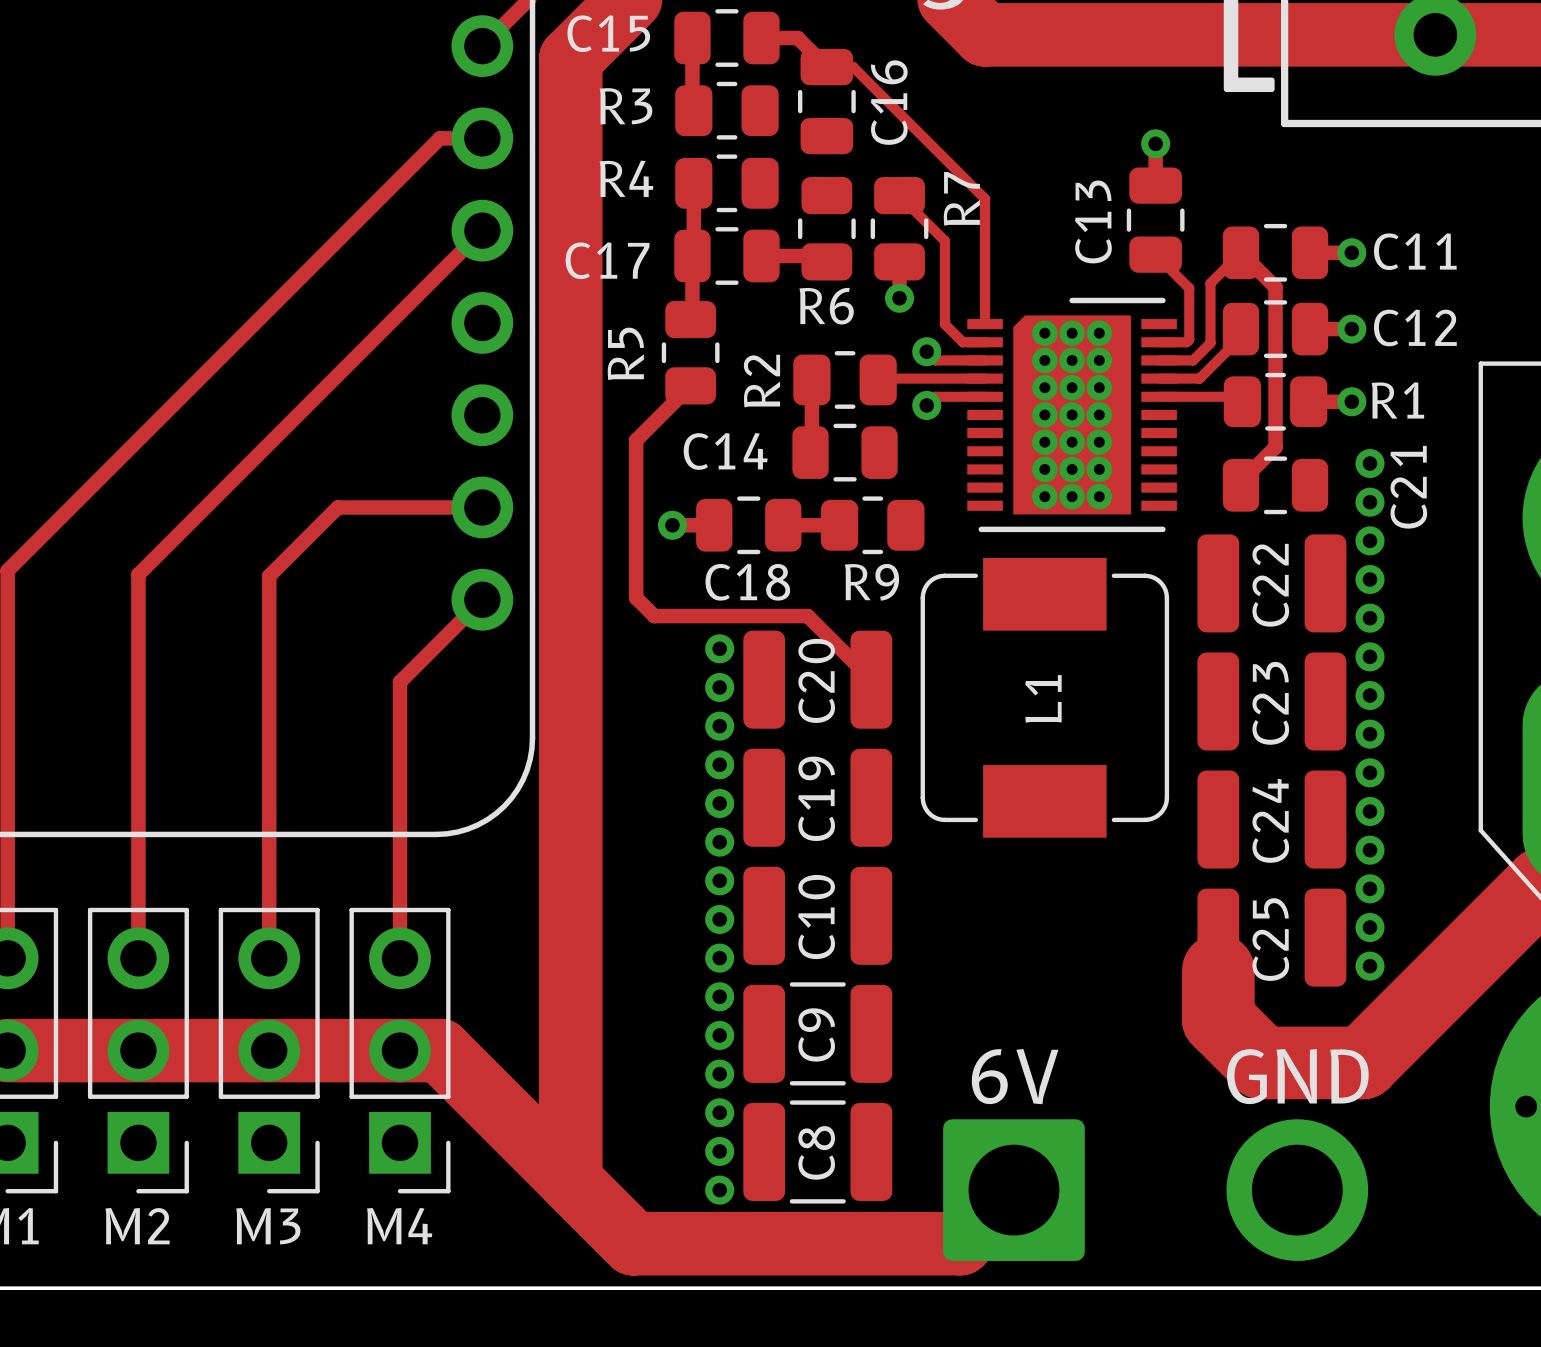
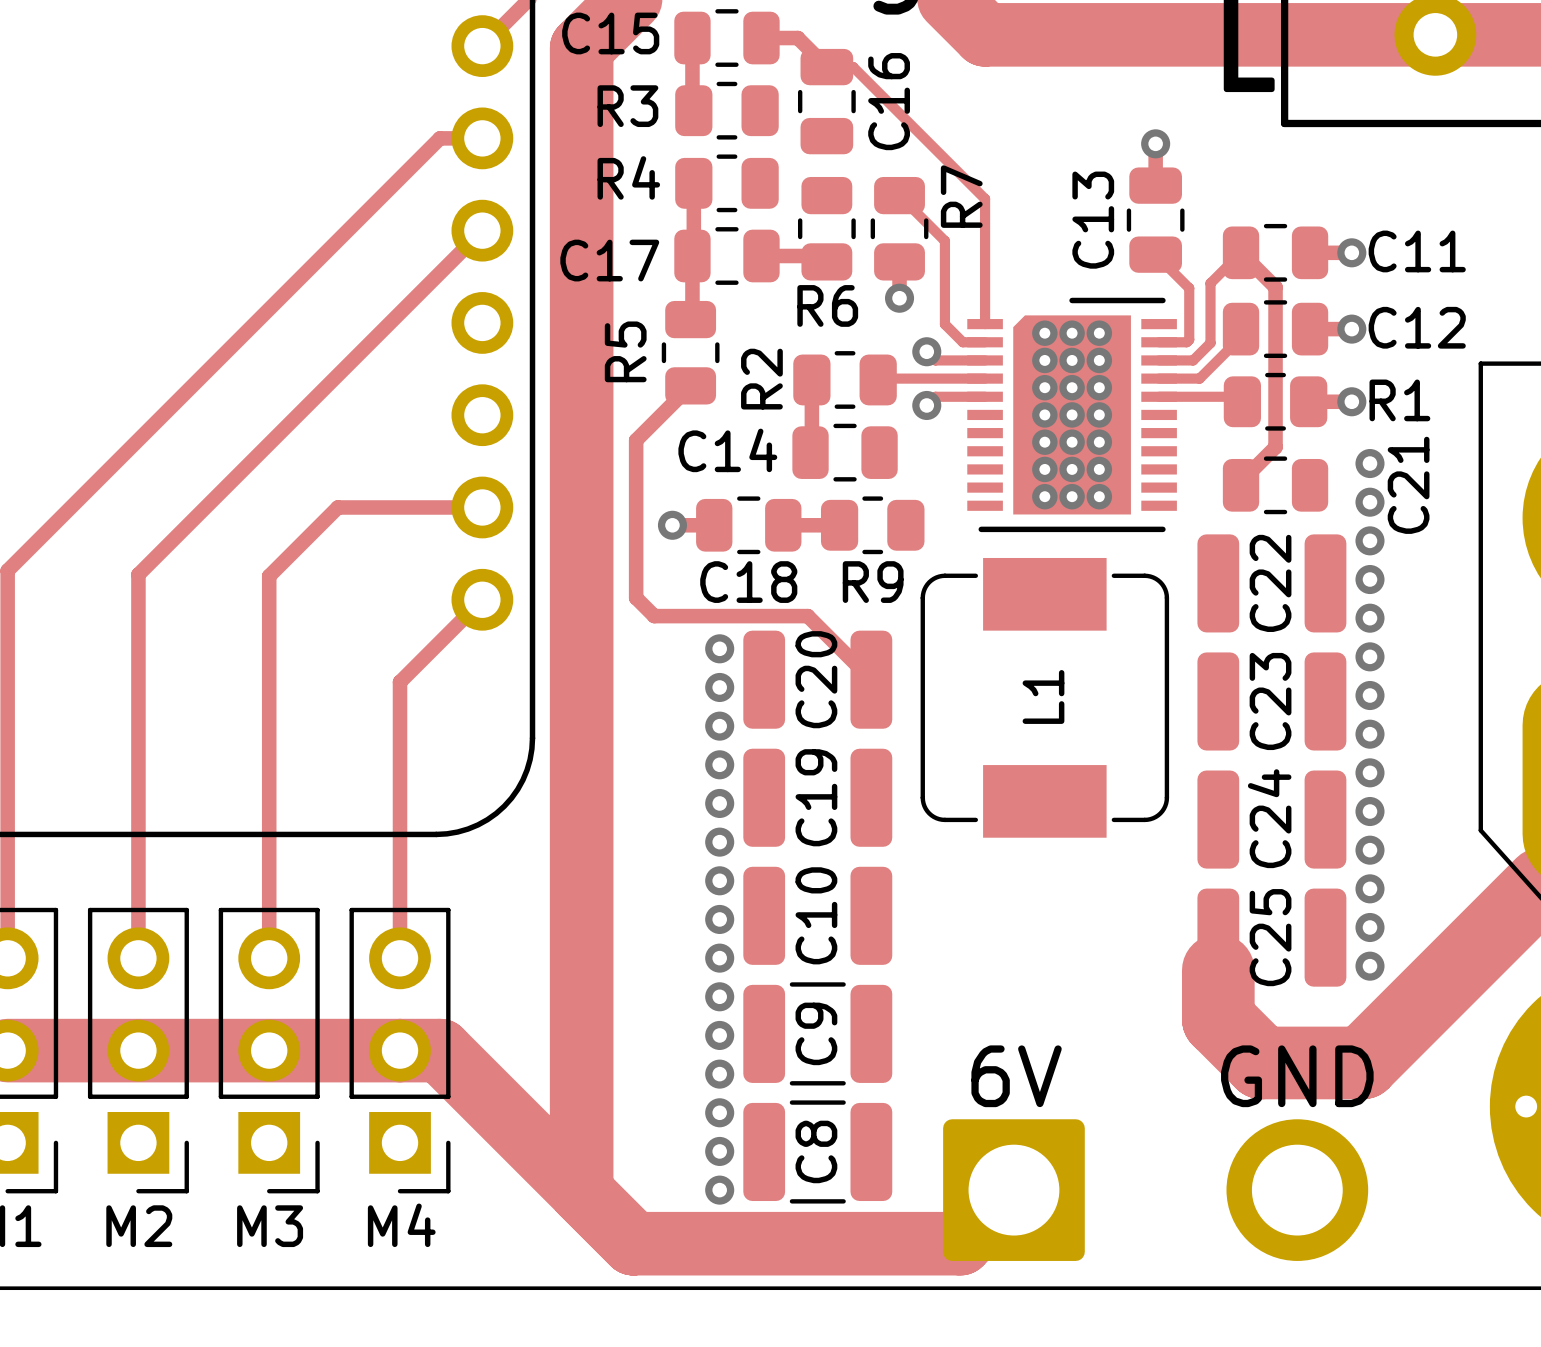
top track: (581, 47) (570, 58) (570, 1181) -> (581, 47) (581, 1192)

